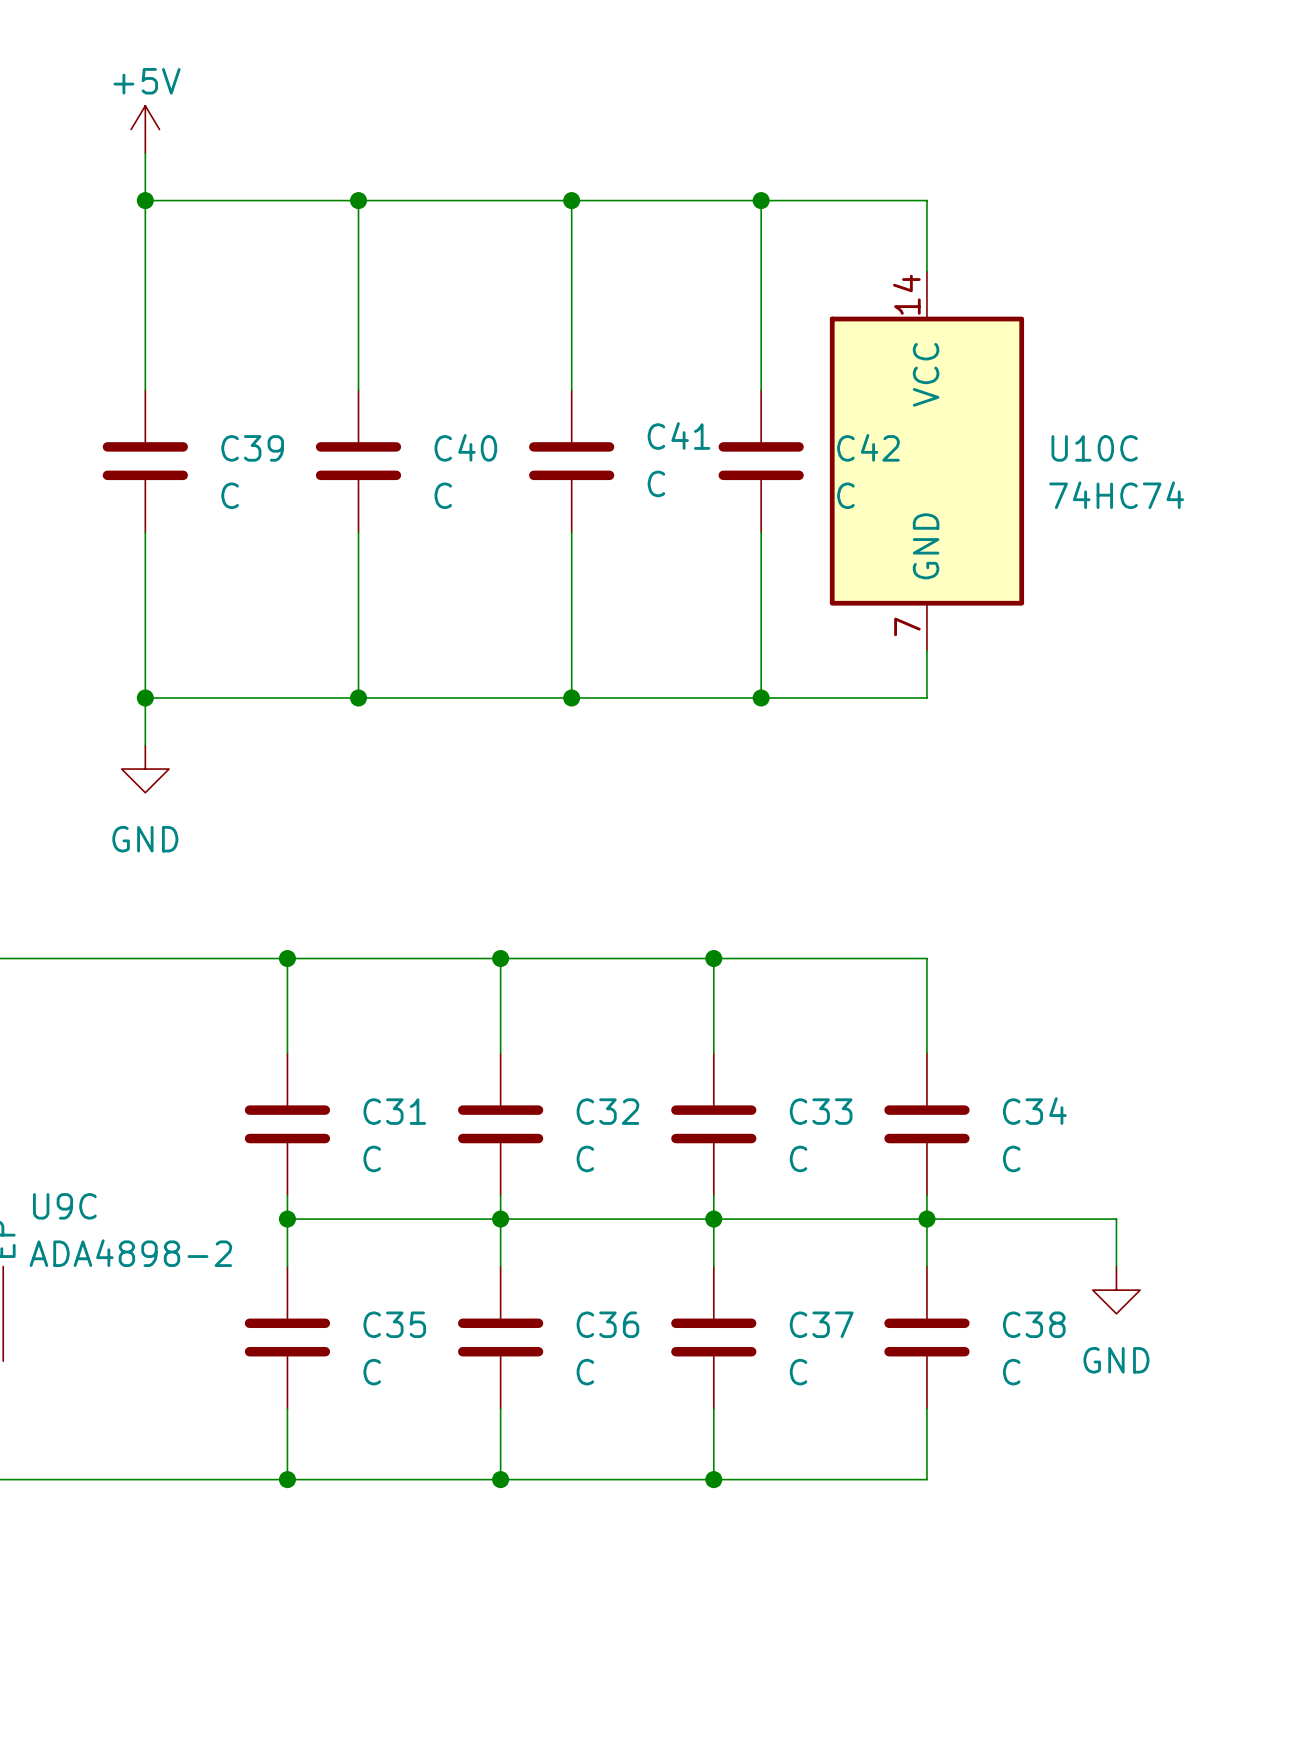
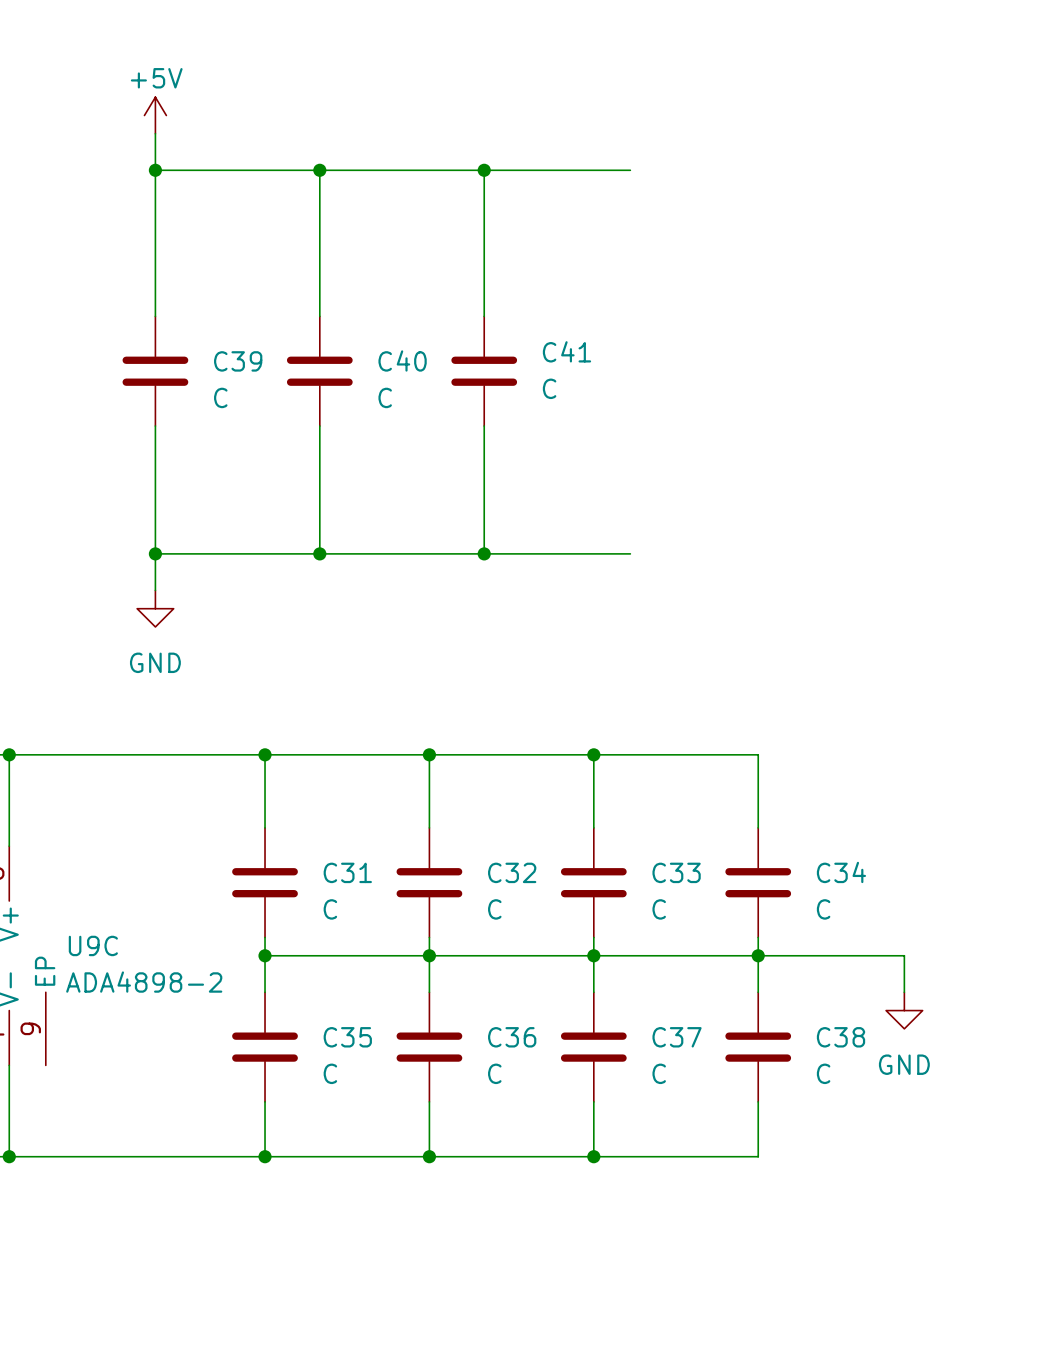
junction: (761, 200) -> none
wire: (926, 271) (926, 200) (761, 200) (761, 390) -> none
C42: C (761, 461) -> none
U10C: 74HC74 (926, 461) -> none
wire: (761, 532) (761, 697) (926, 697) (926, 650) -> none
junction: (761, 697) -> none

